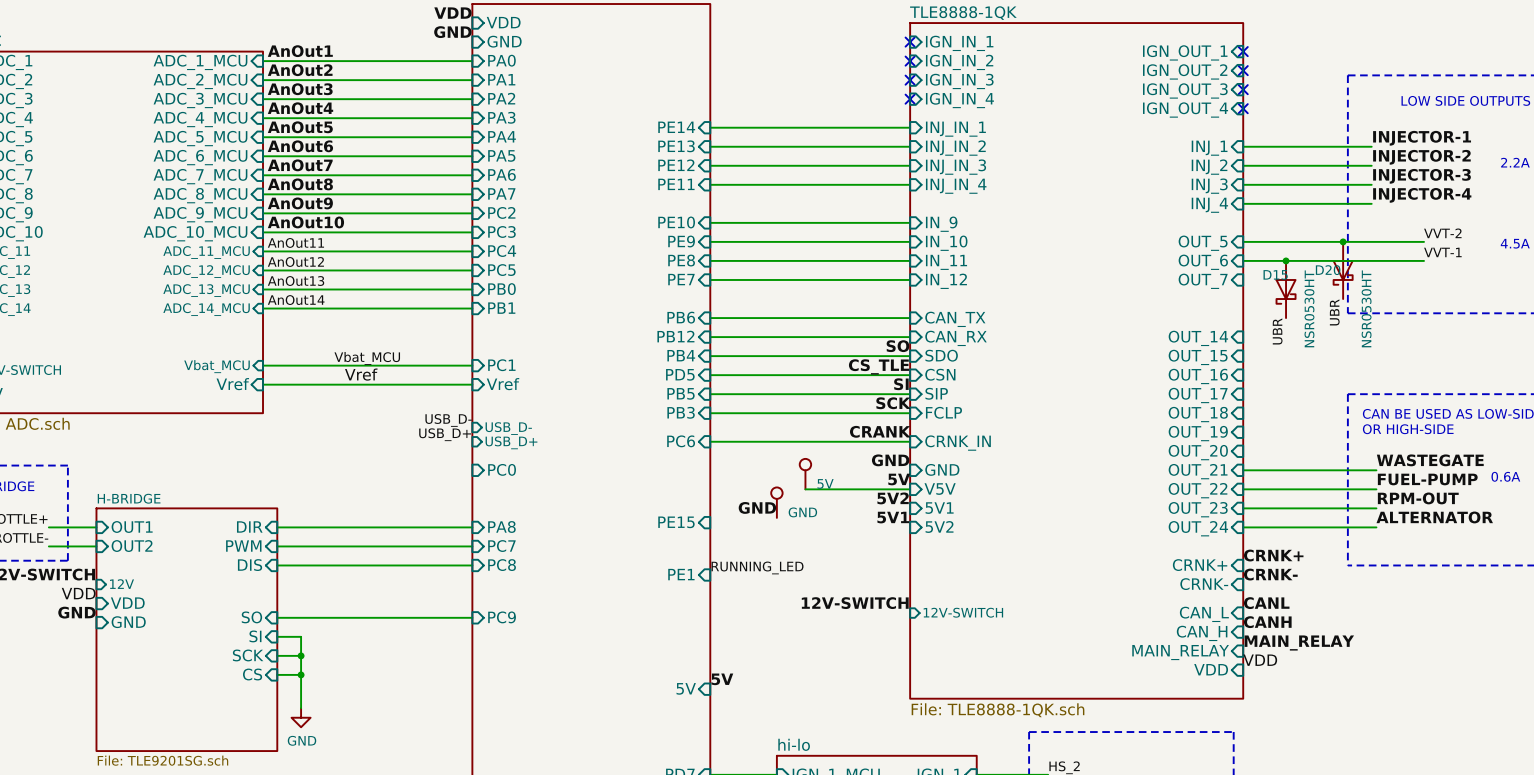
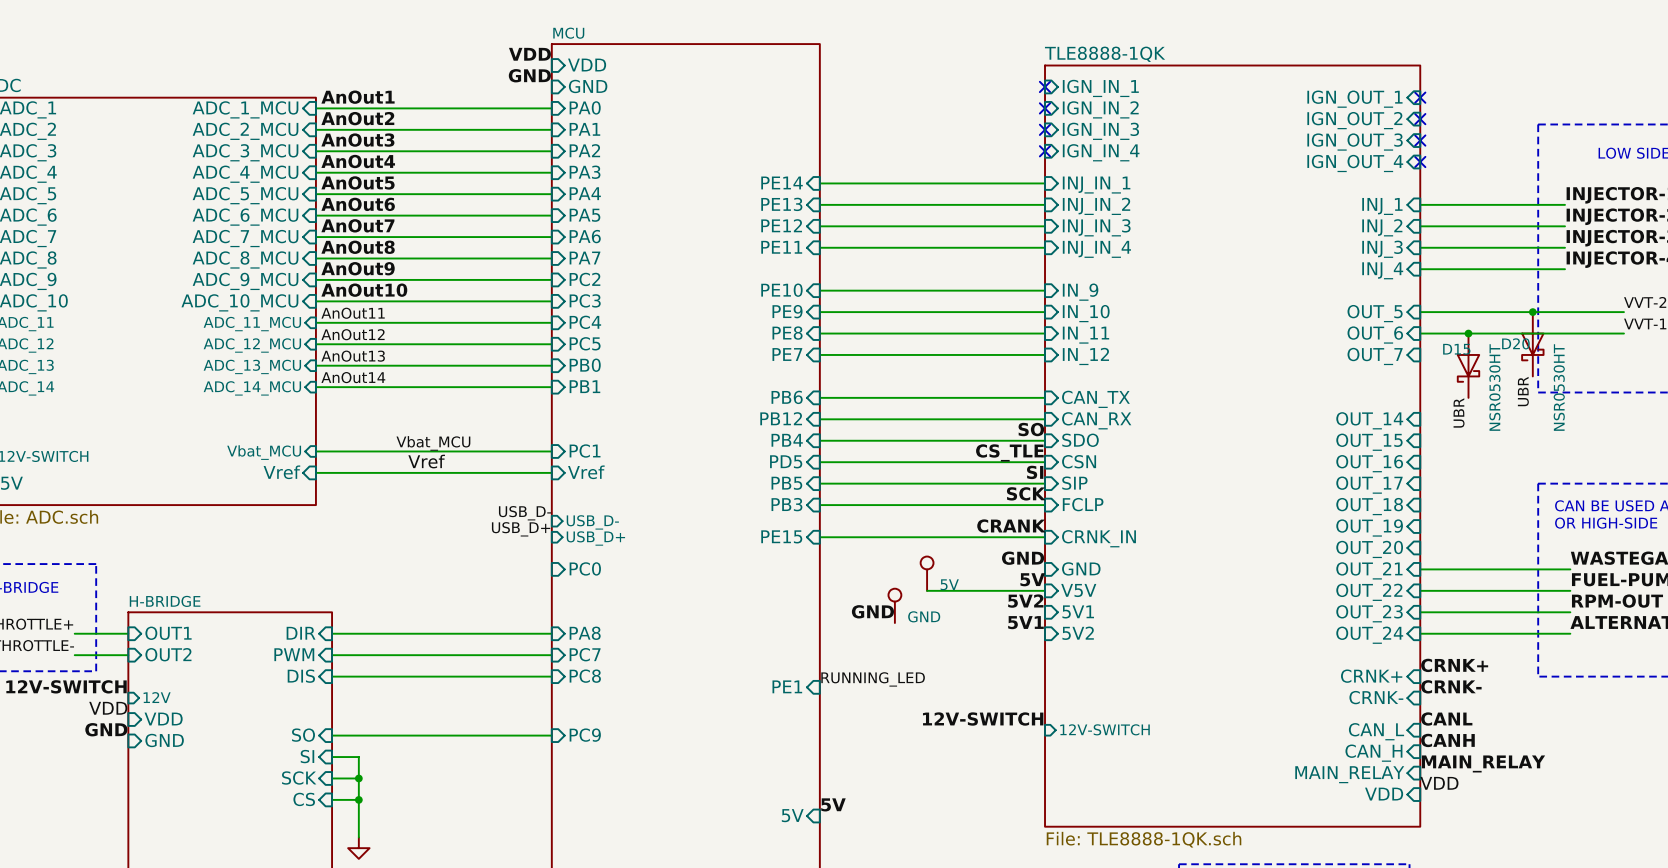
sheet pin: PC6 (681, 441) -> PE15 (781, 536)
sheet pin: PE15 (676, 522) -> none

